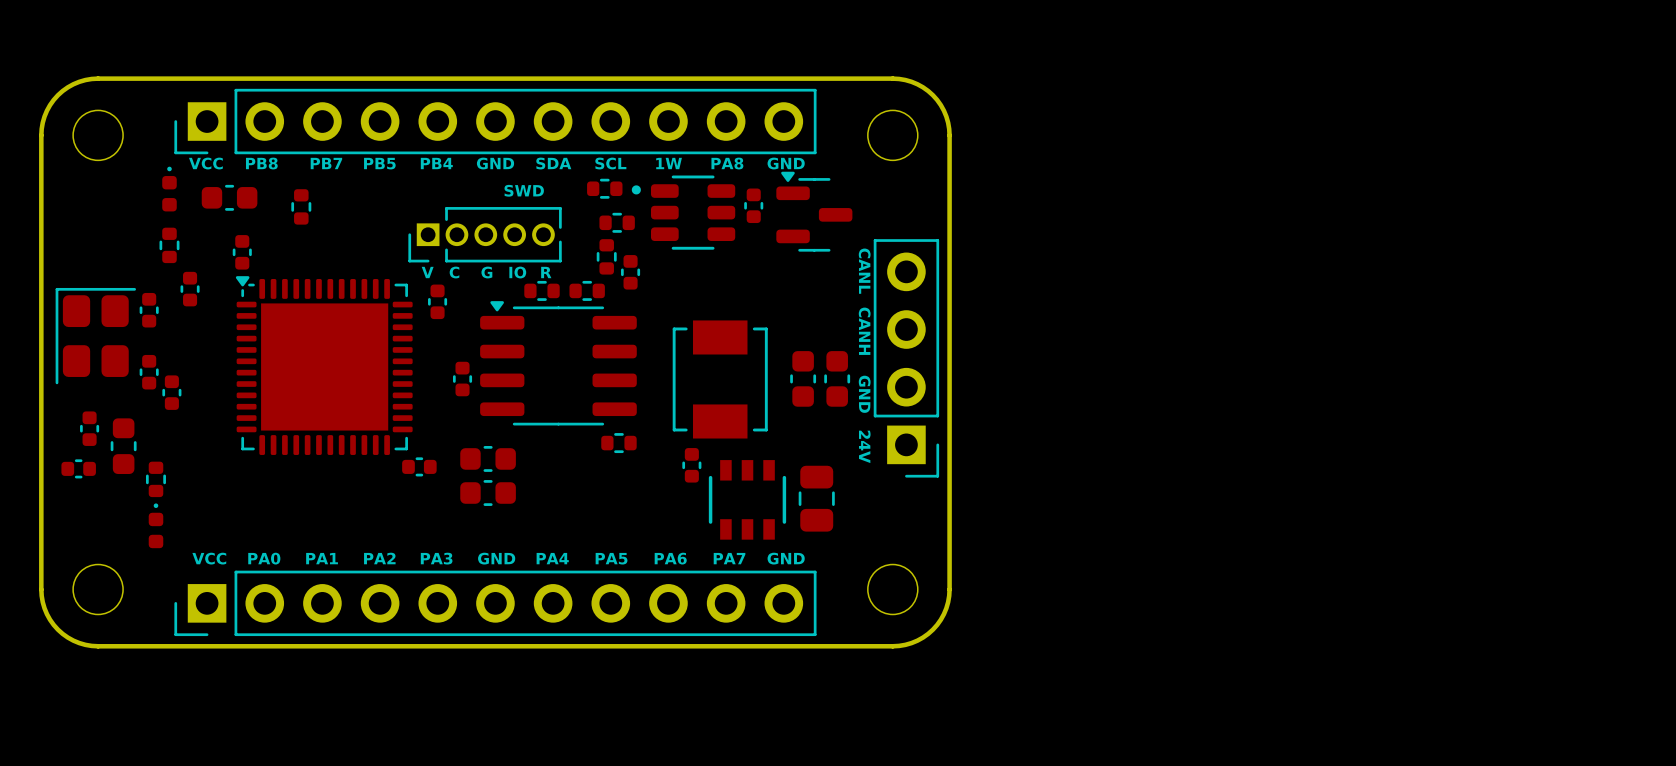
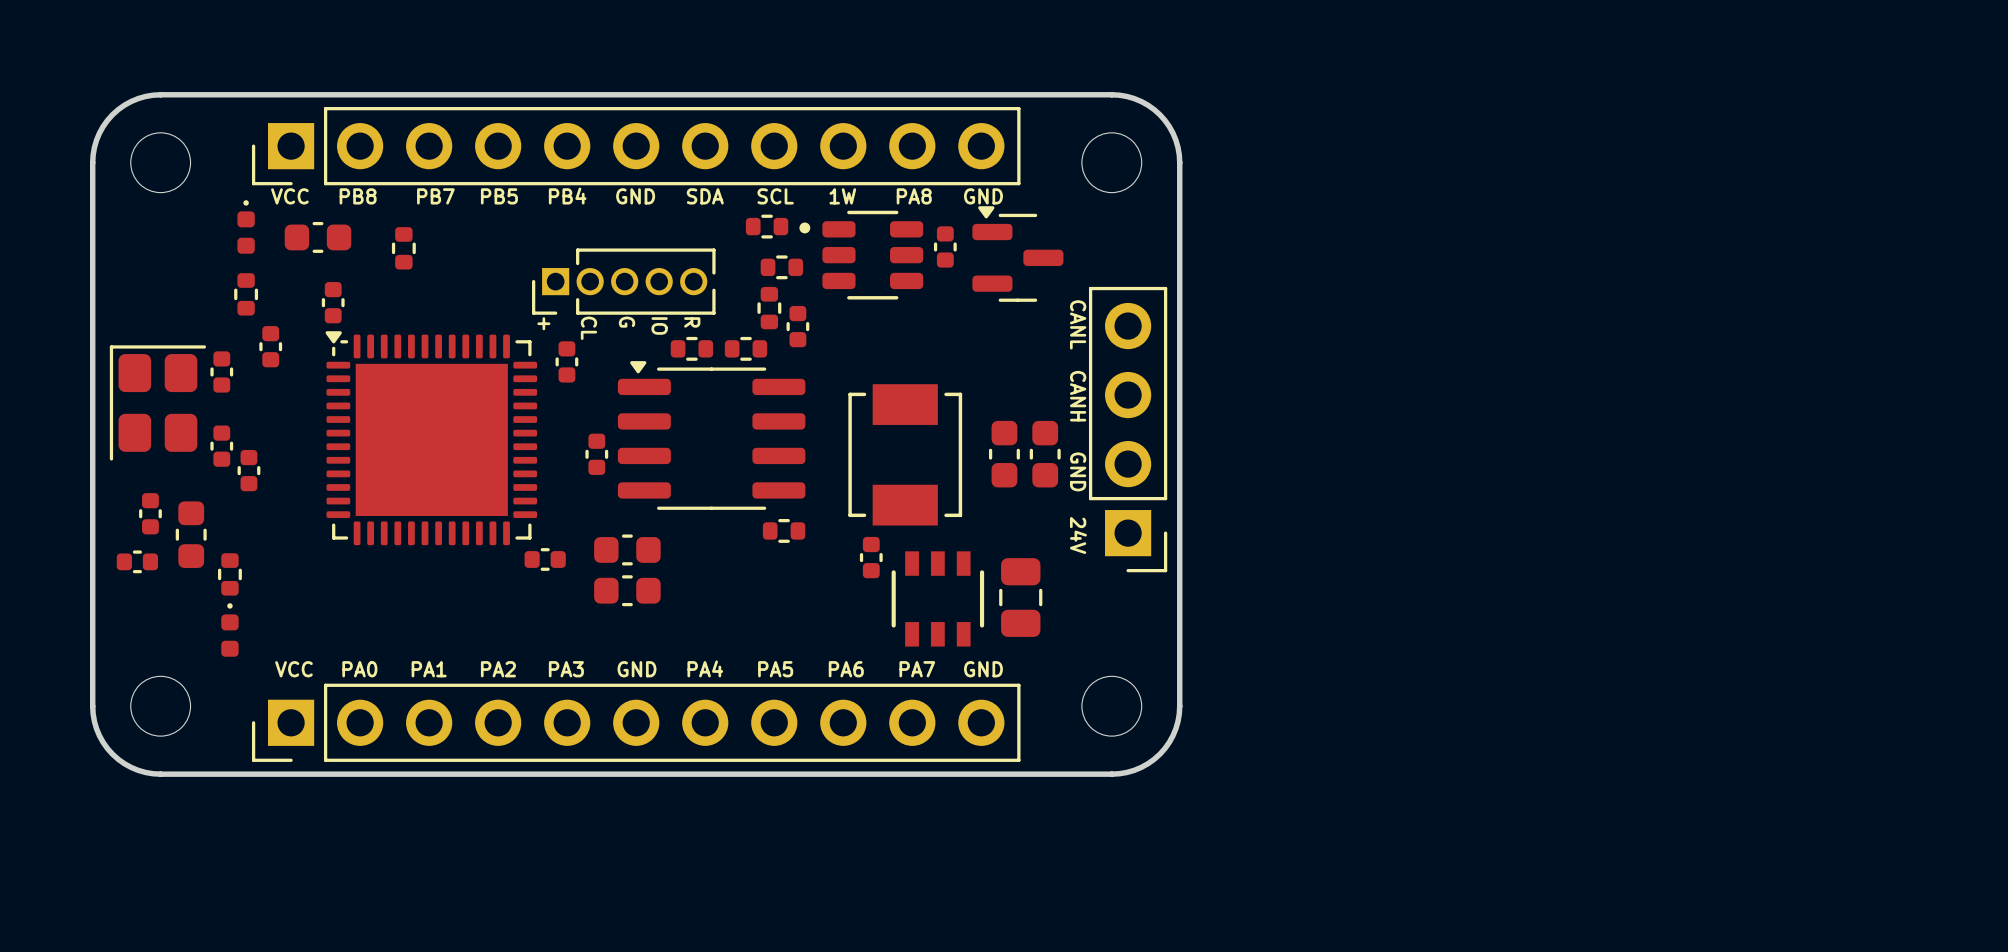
text: SWD (524, 190) -> none
text: none -> + (543, 323)
text: V (427, 272) -> none
text: C (454, 272) -> CL (588, 328)
text rotation: 0° (486, 272) -> 90° clockwise (627, 322)
text rotation: 0° (517, 272) -> 90° clockwise (659, 326)
text rotation: 0° (546, 272) -> 90° clockwise (692, 322)

